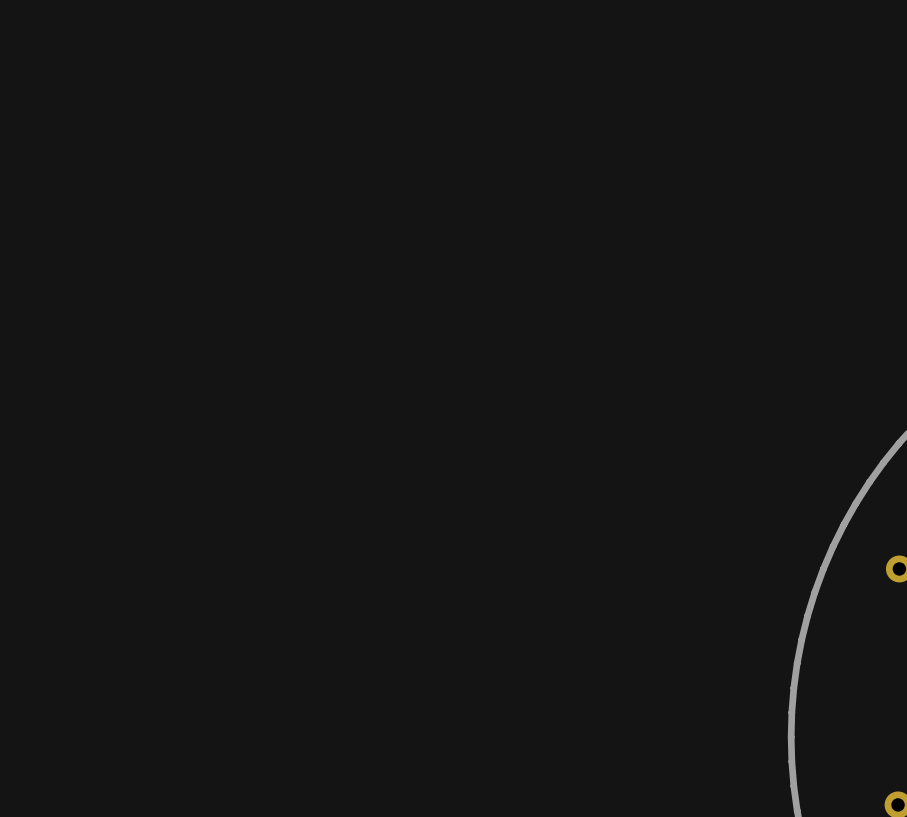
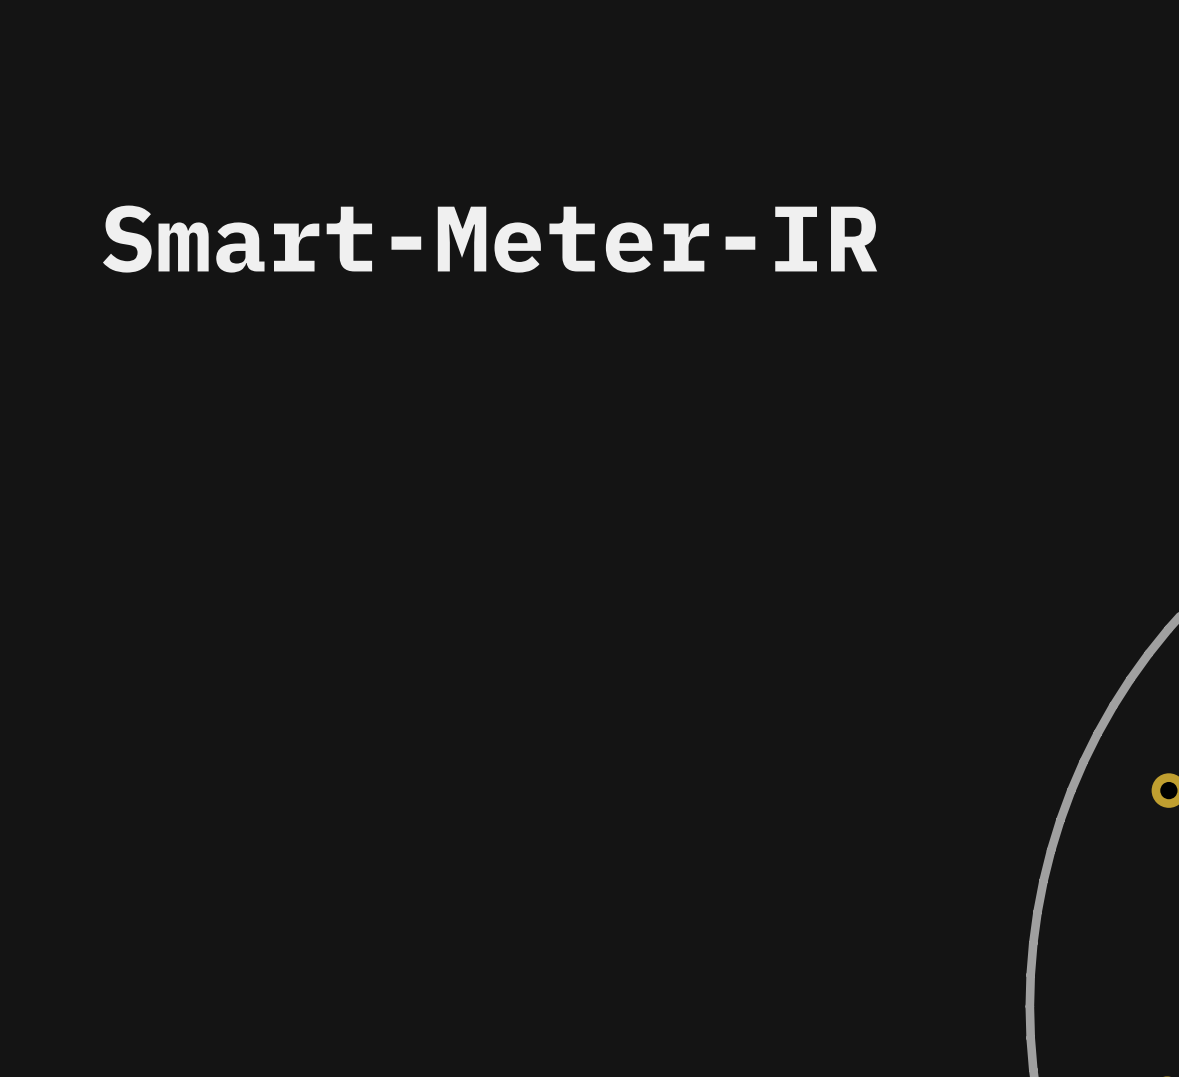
text: none -> Smart-Meter-IR (490, 239)

